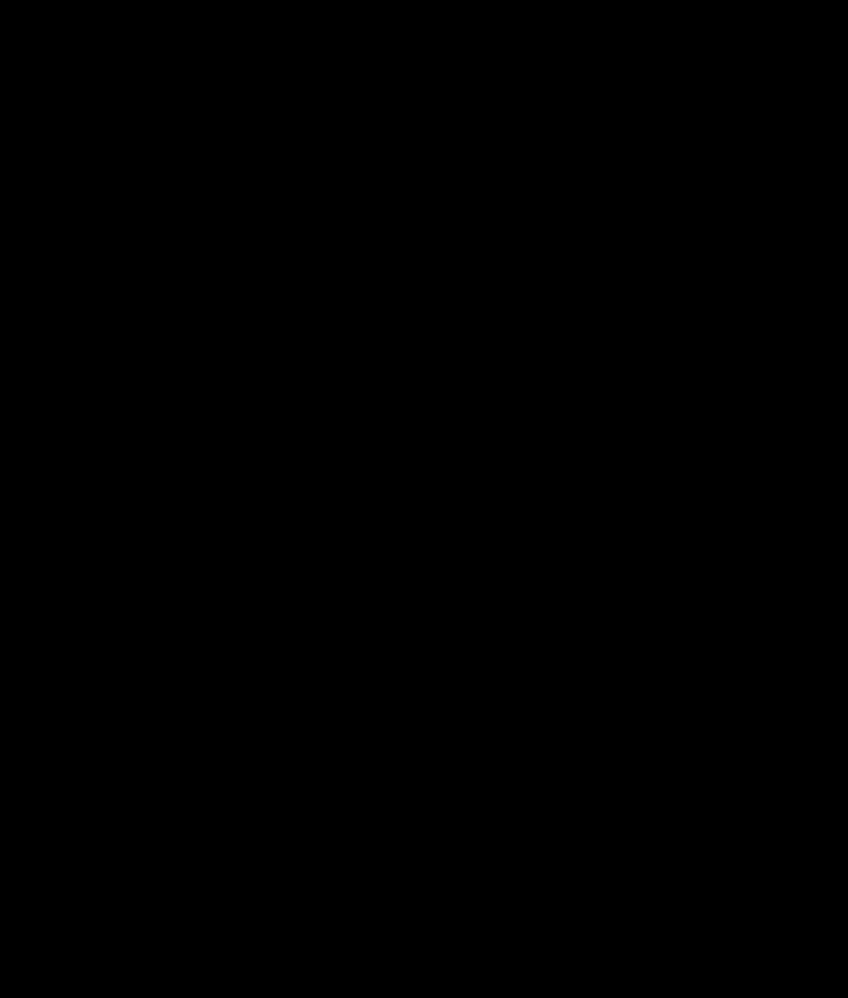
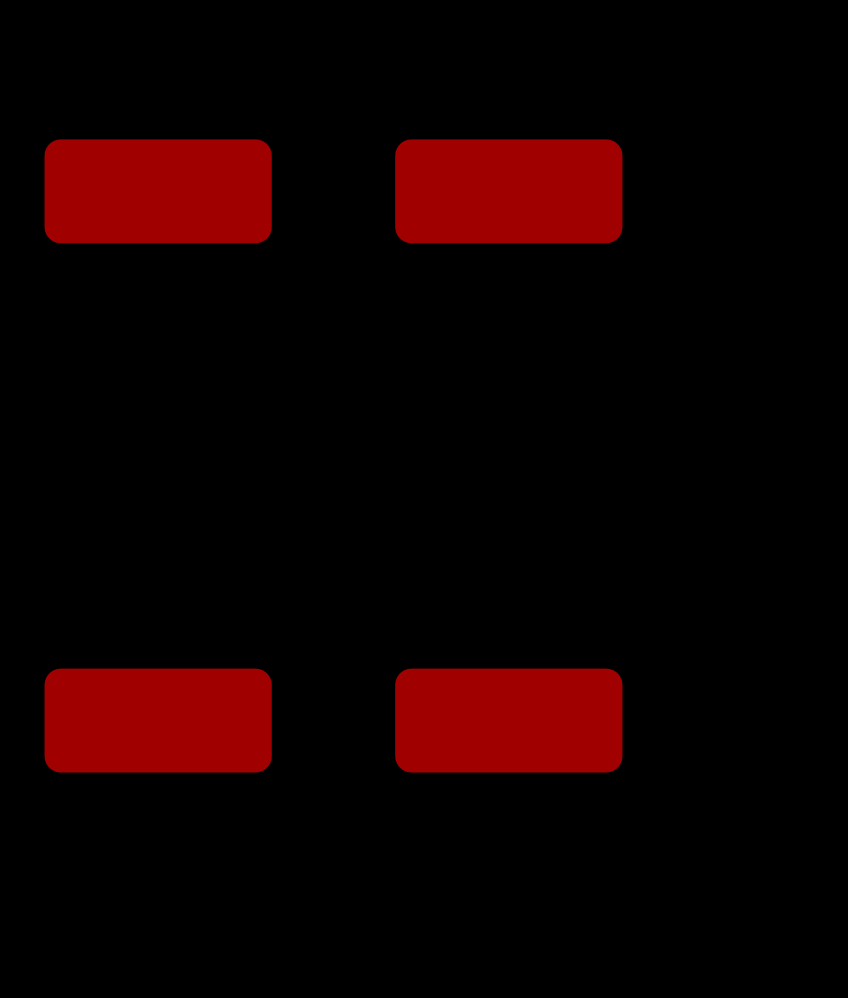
part: none -> (333, 191)
part: none -> (333, 720)

